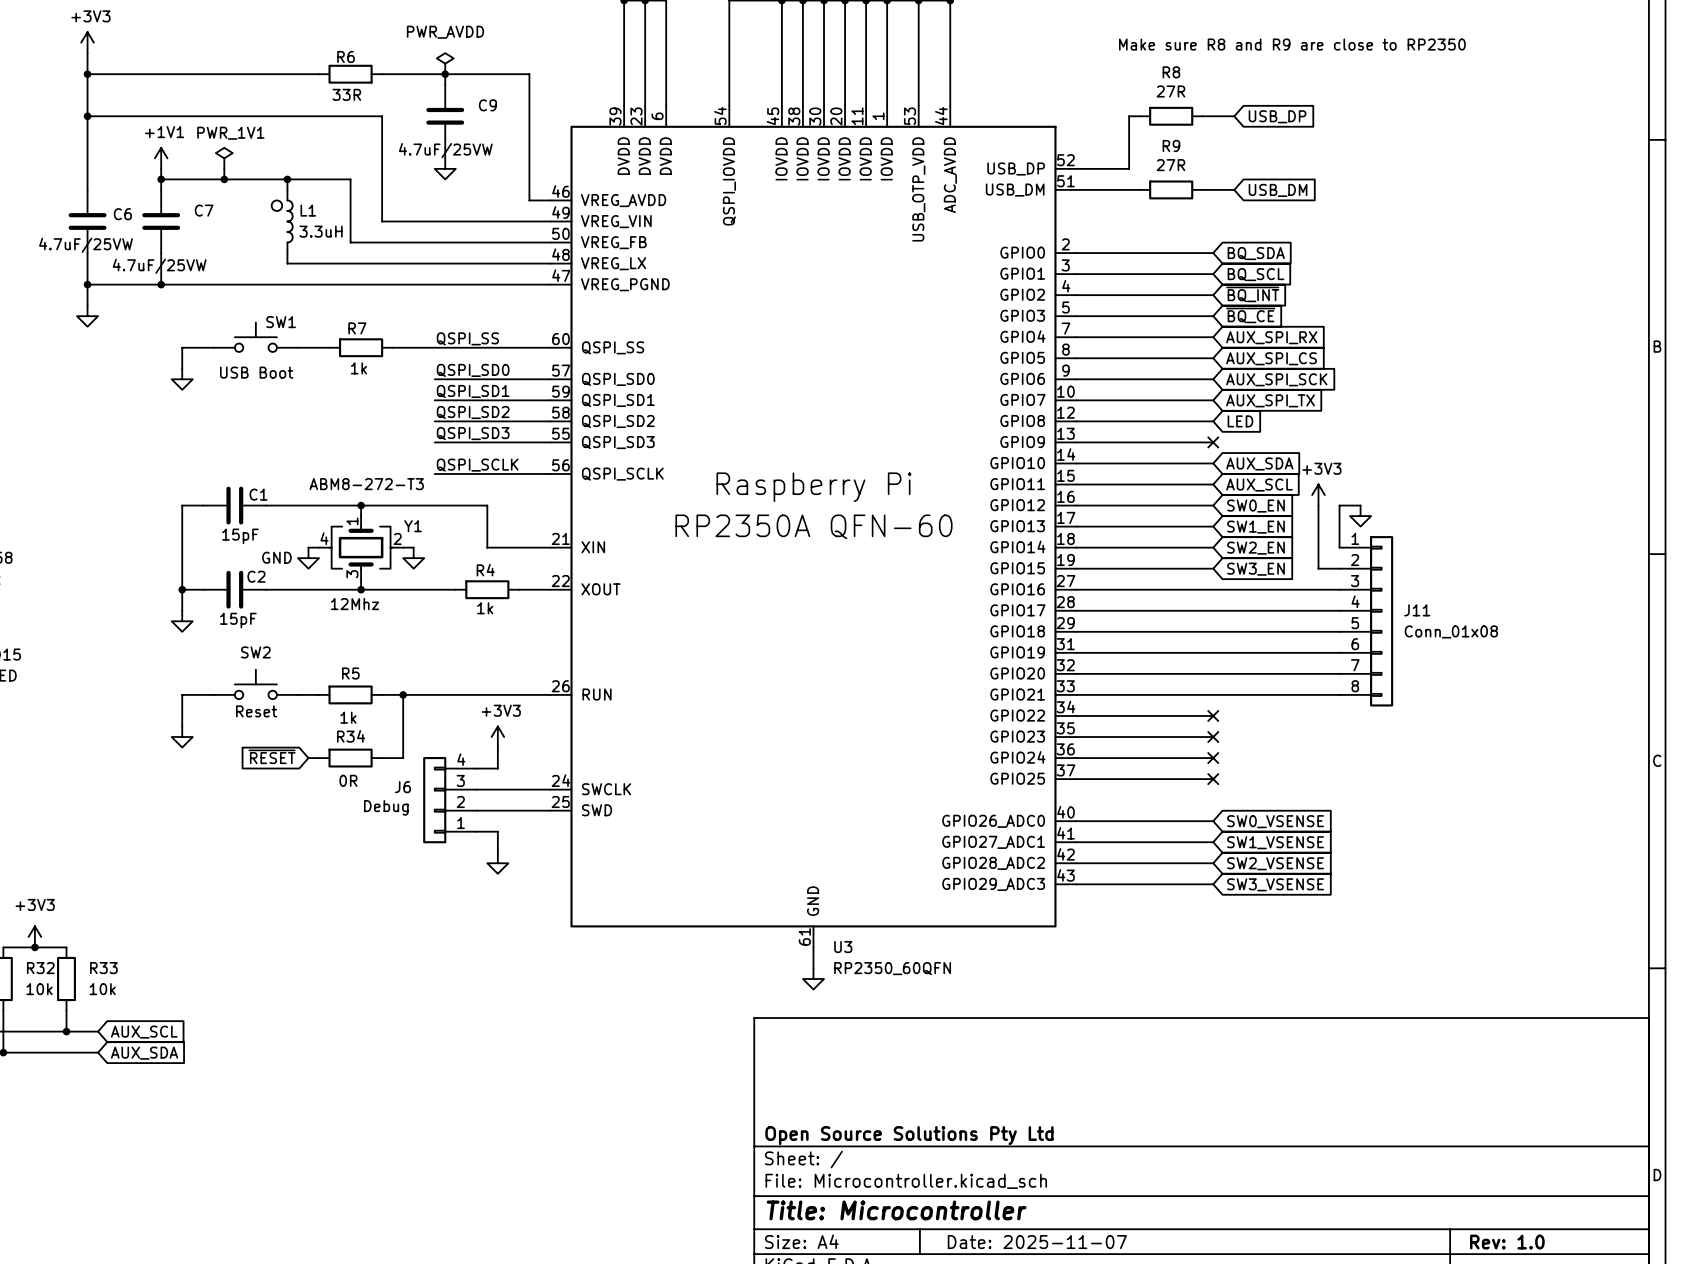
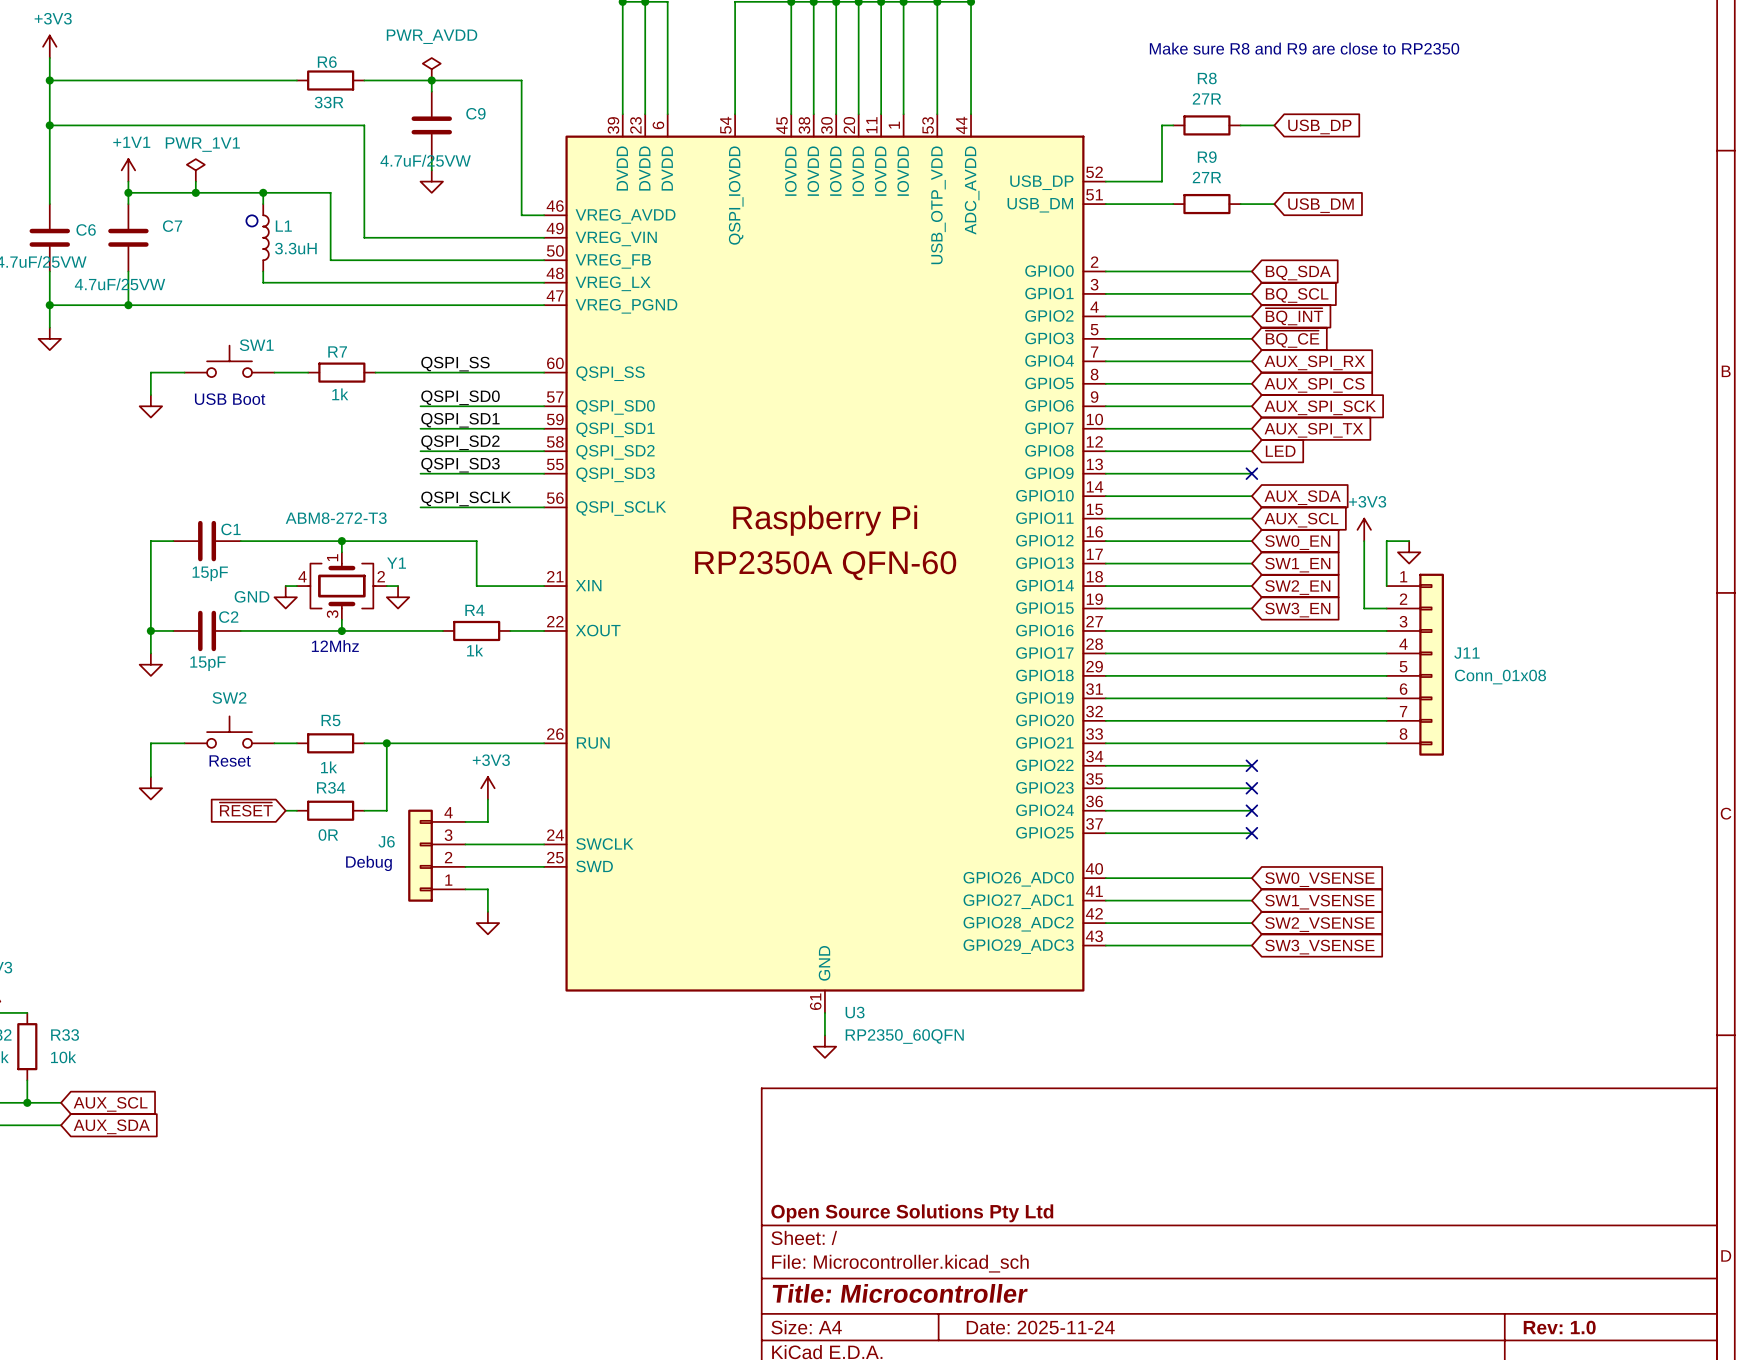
title block: Date: 2025-11-07 (1037, 1242) -> Date: 2025-11-24 (1040, 1327)

